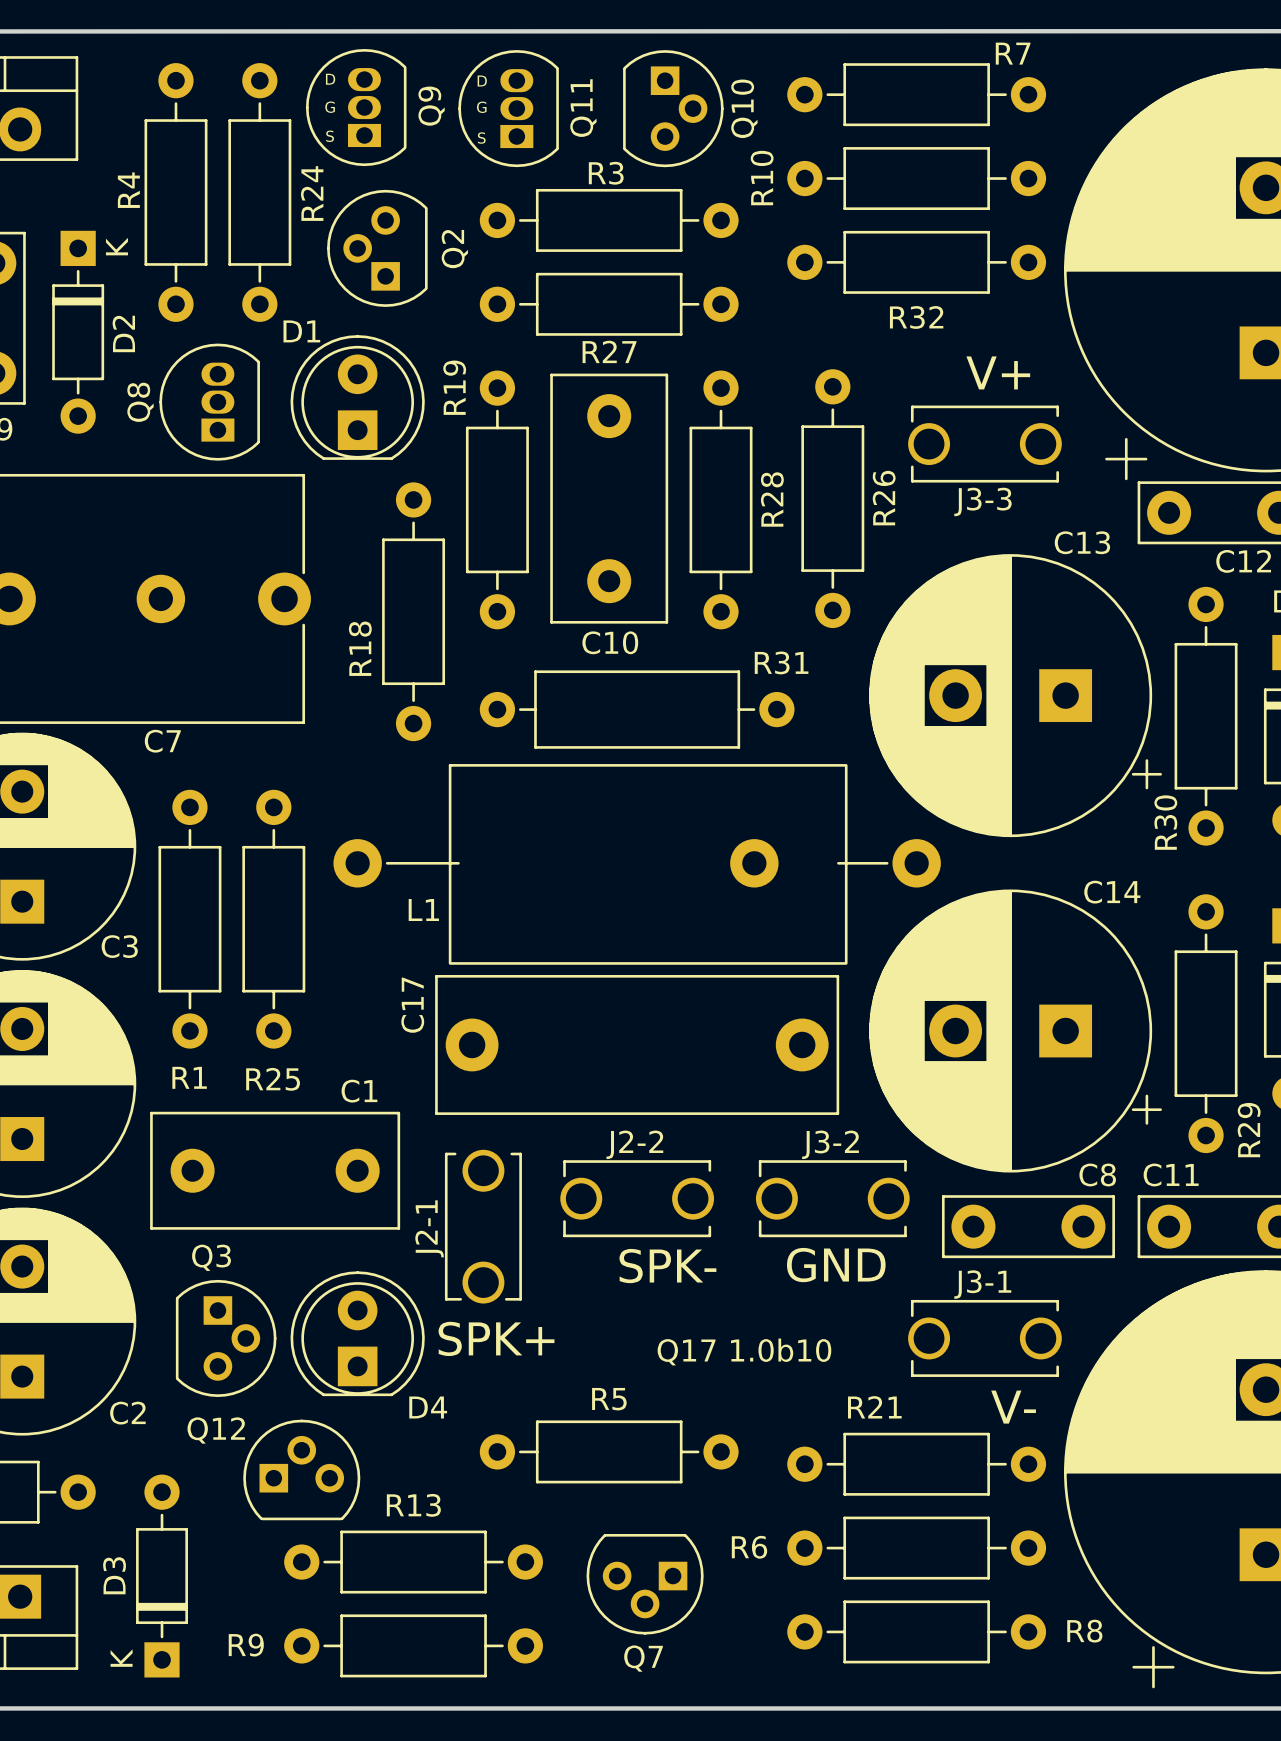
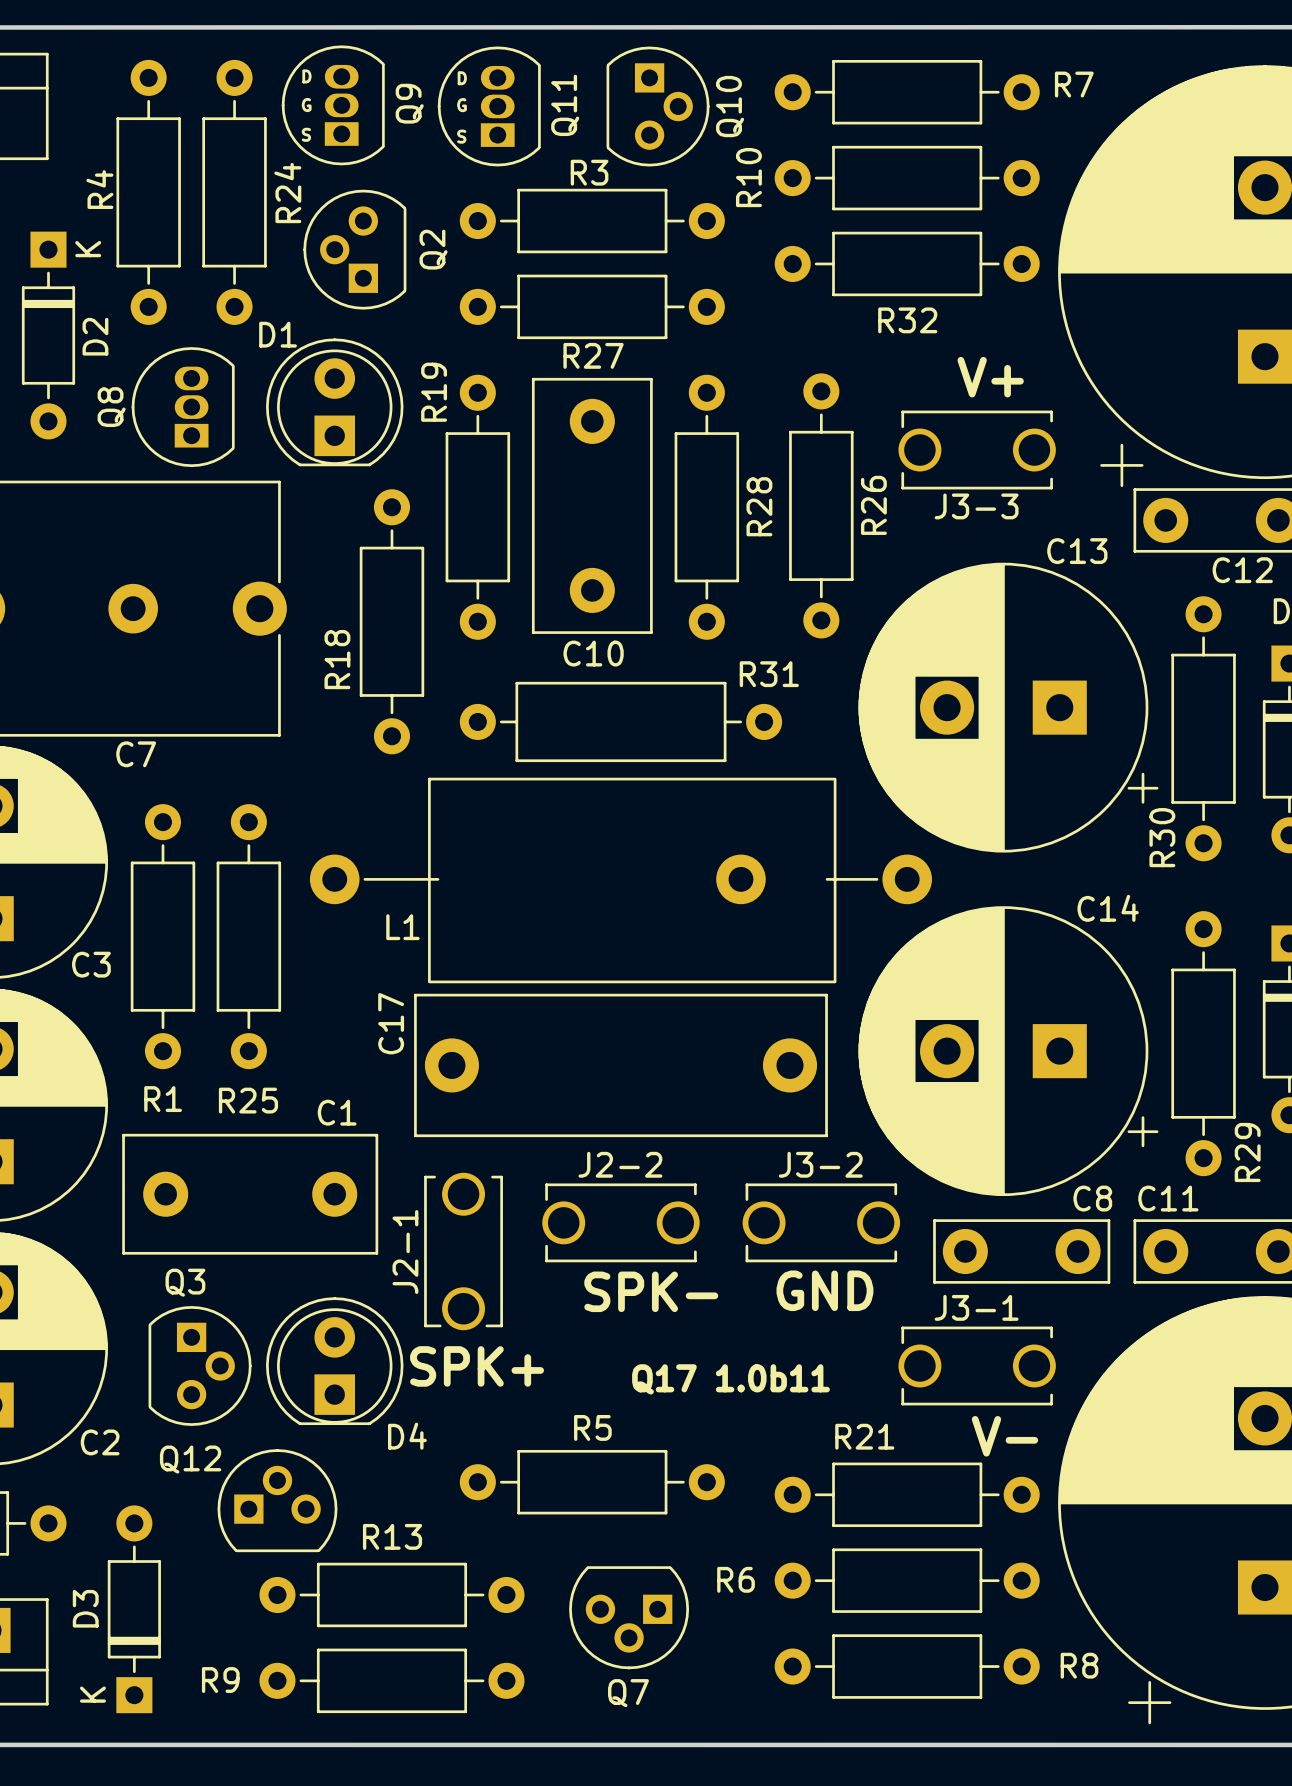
R7 name position: R7 (1013, 53) -> R7 (1074, 84)
text: Q17 1.0b10 (744, 1351) -> Q17 1.0b11 (730, 1379)

